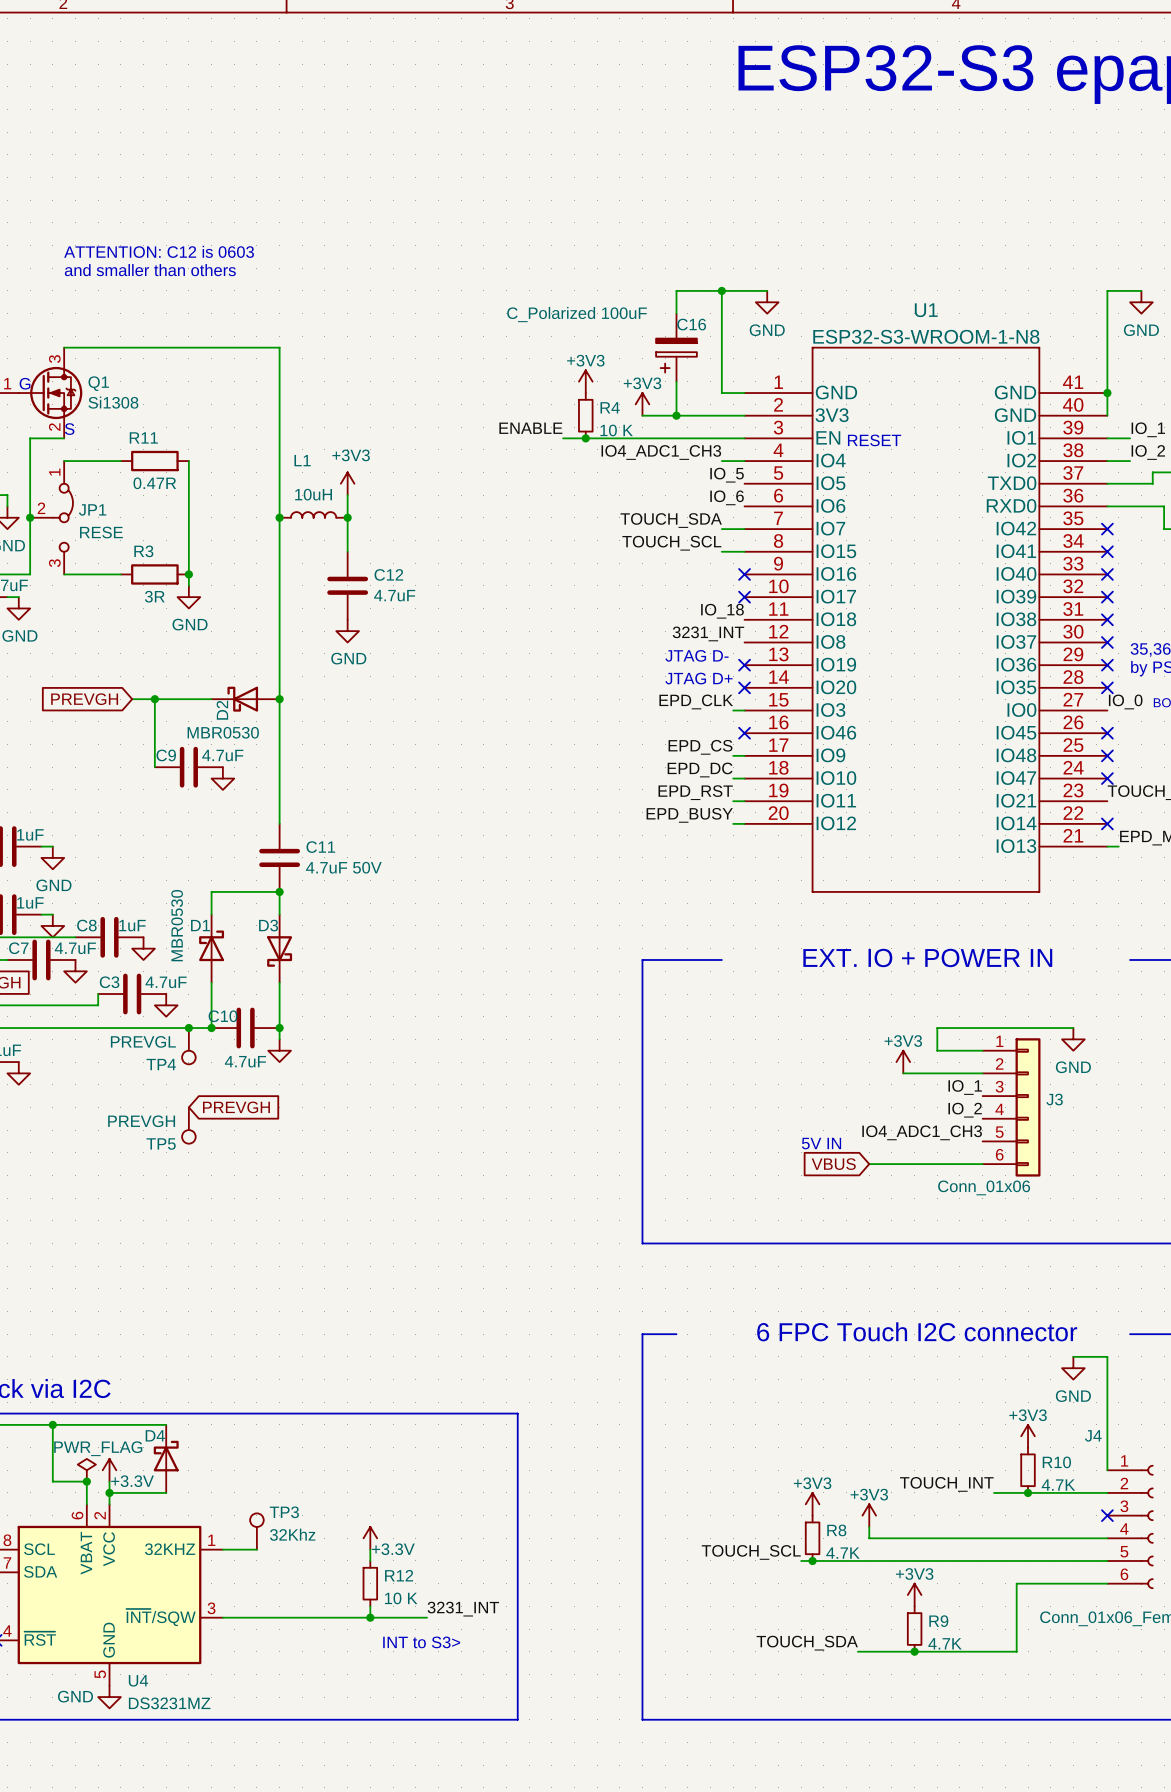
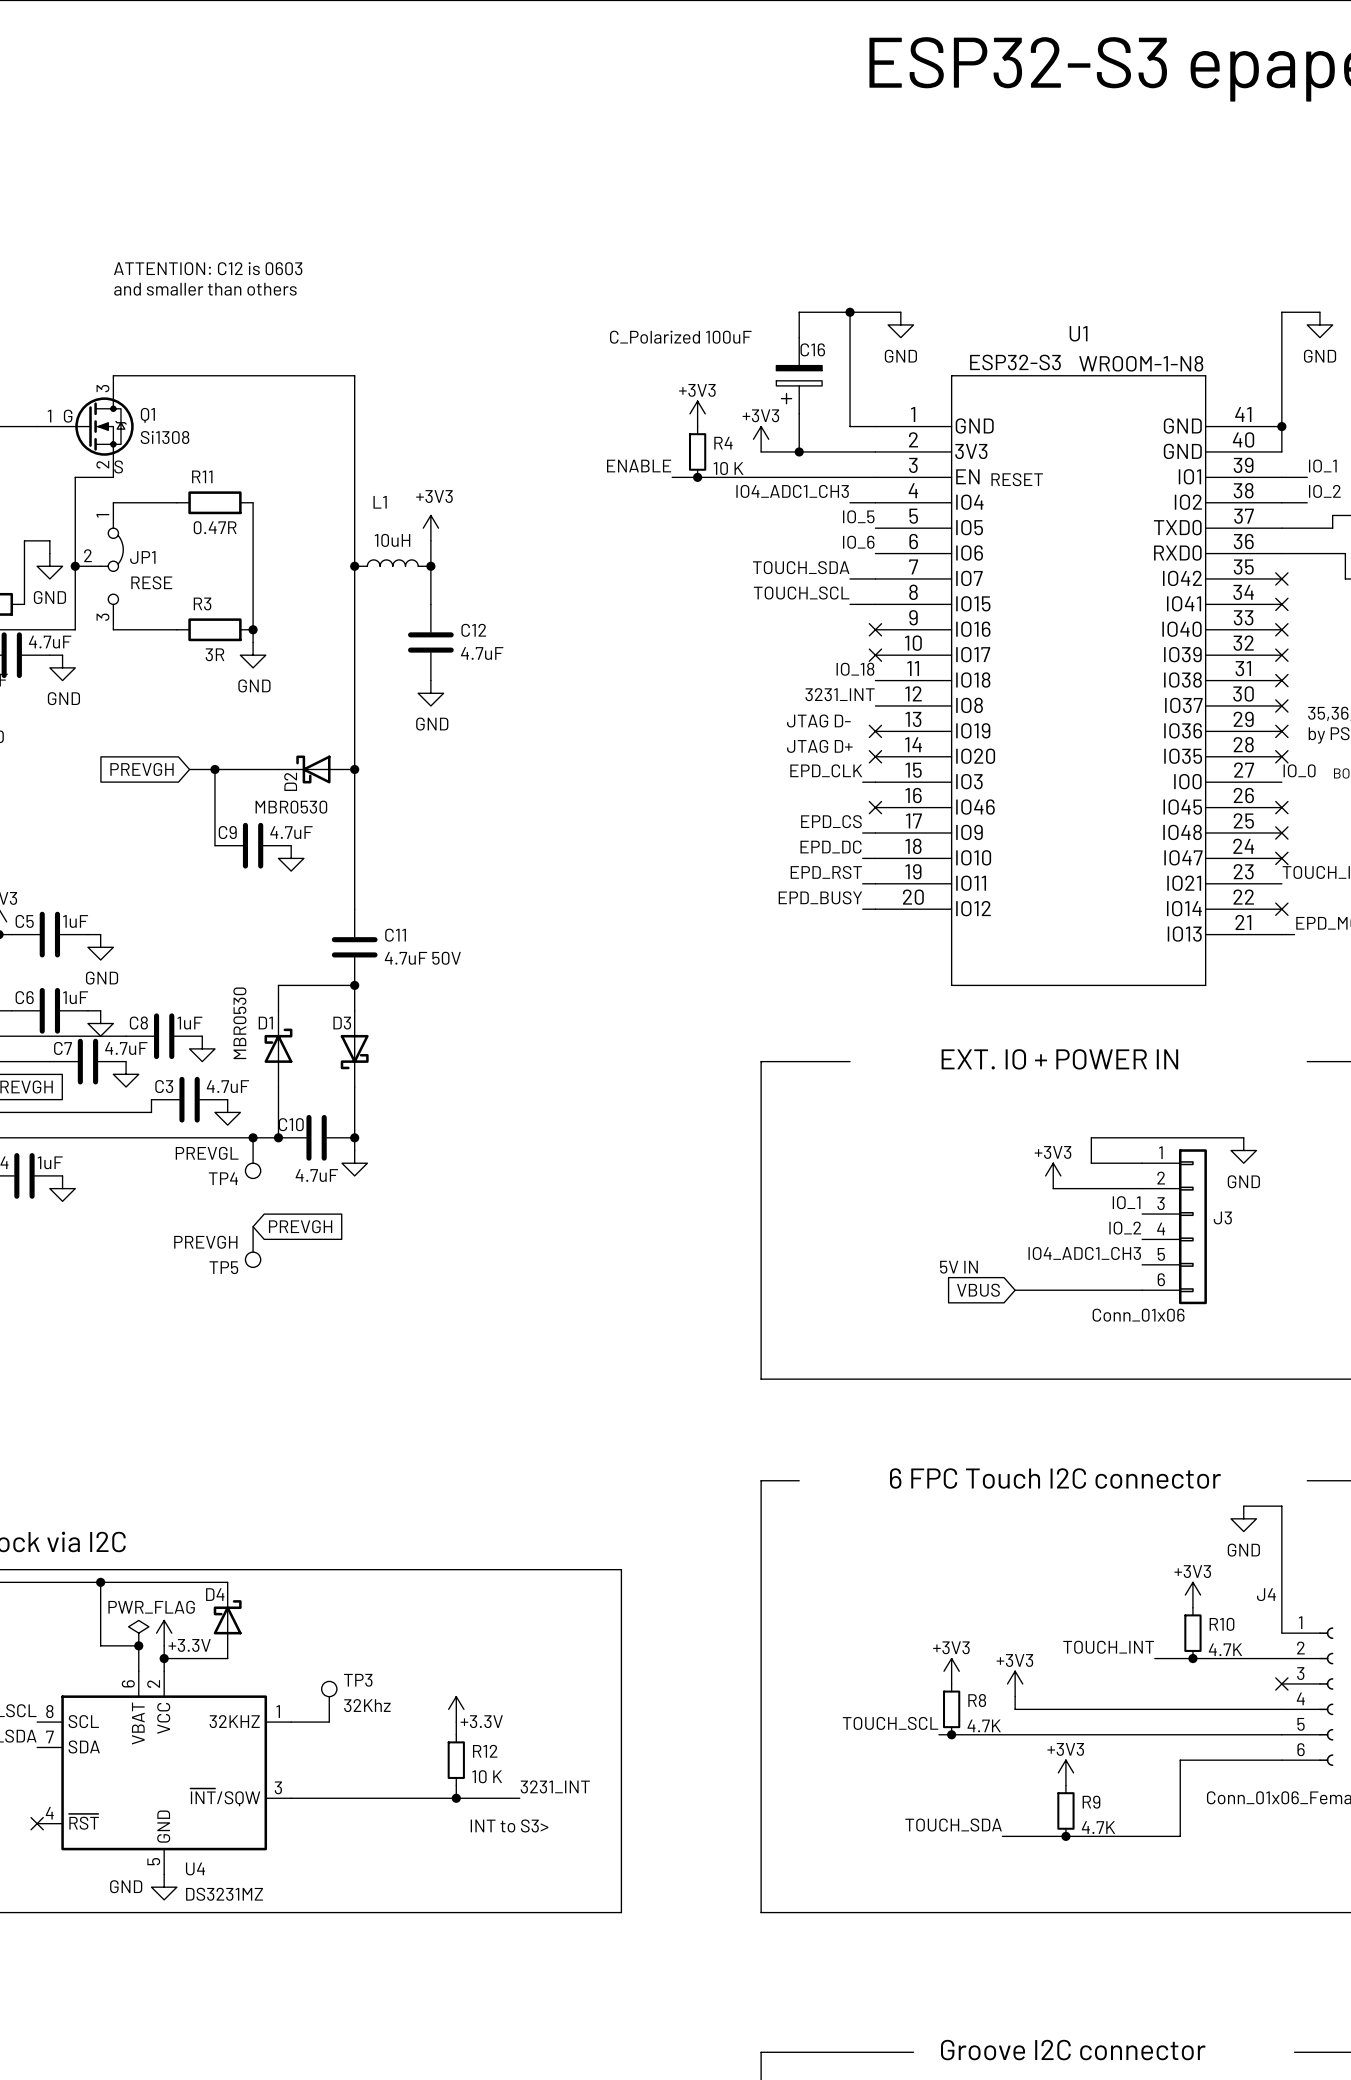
U1 value: ESP32-S3-WROOM-1-N8 (926, 336) -> ESP32-S3 (1015, 362)
text: none -> WROOM-1-N8 (1141, 363)

